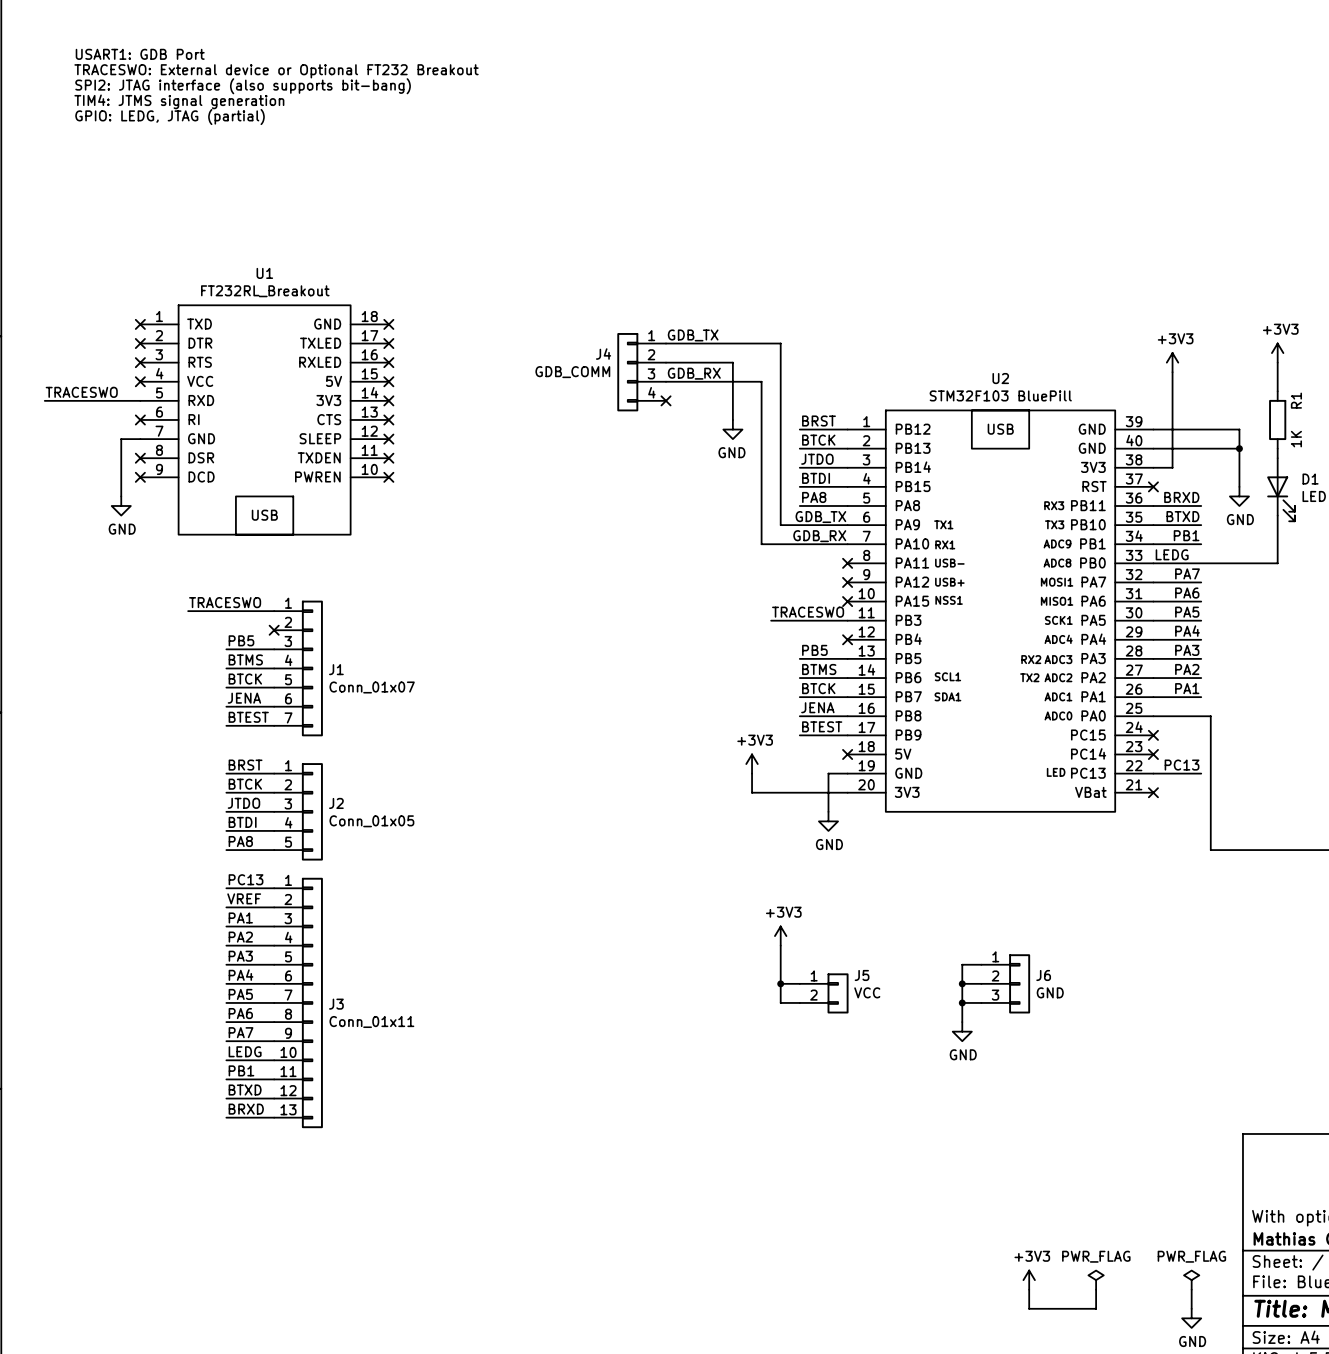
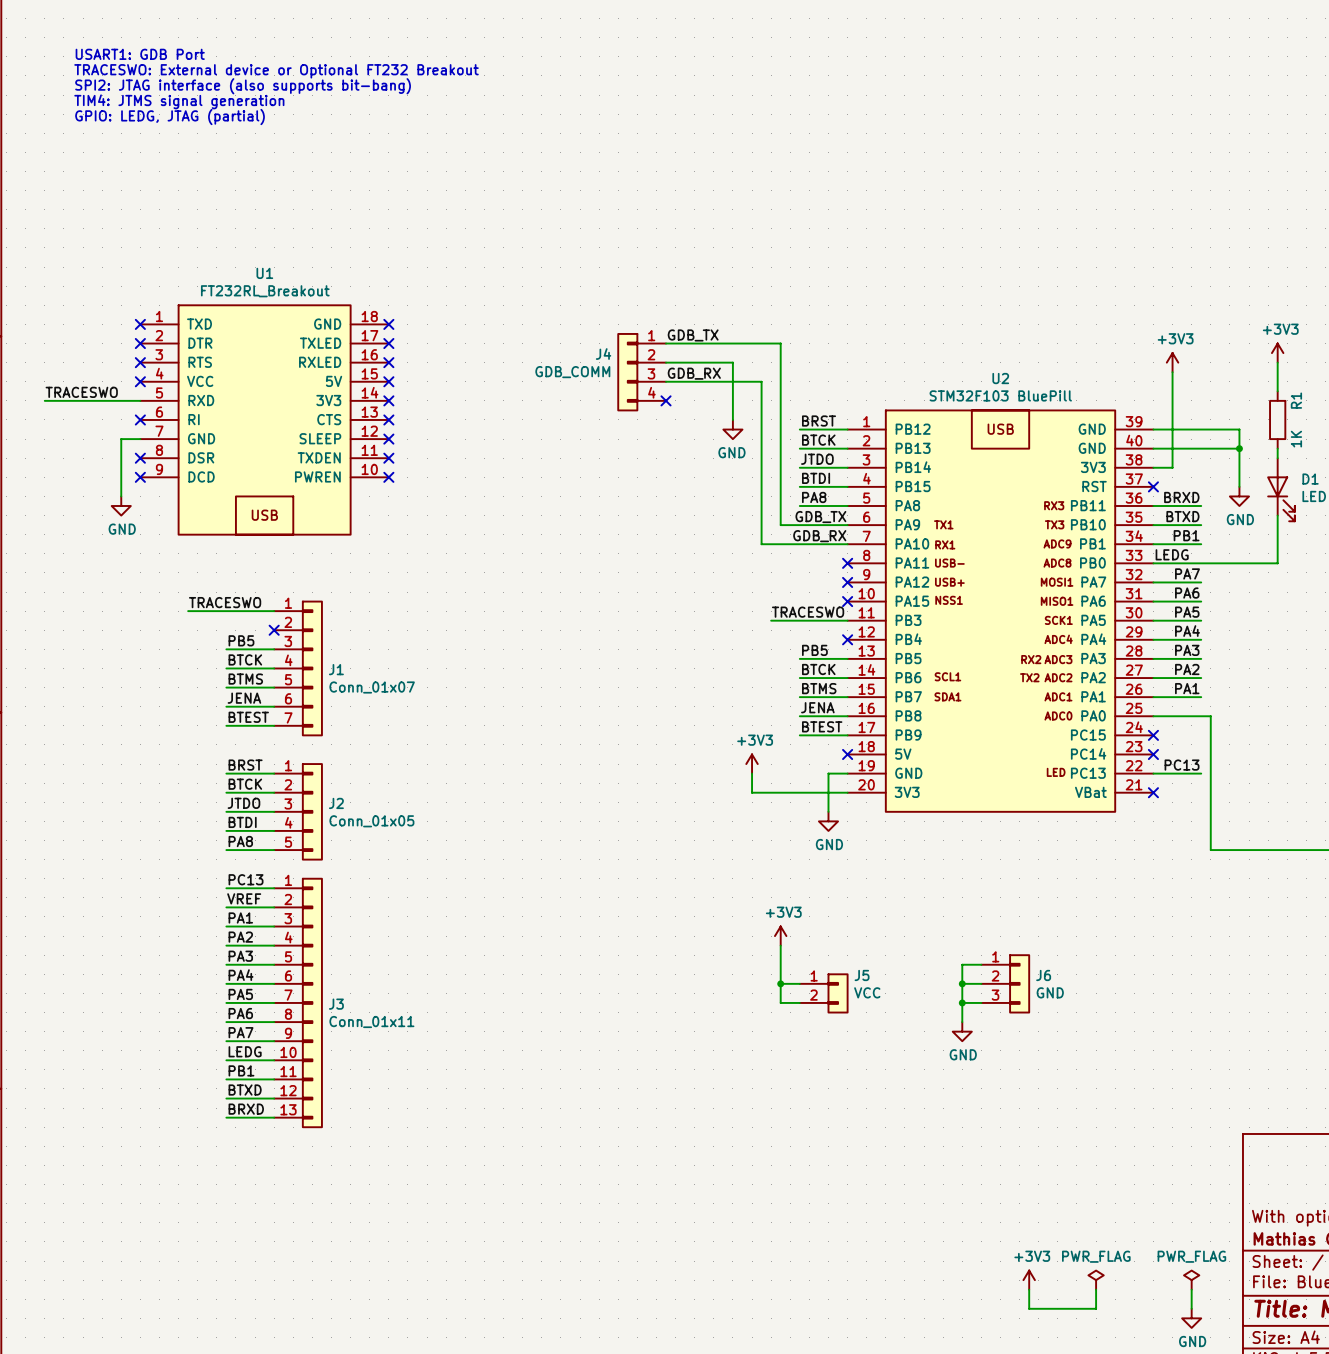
label: BTMS (245, 659) -> BTCK (245, 659)
label: BTMS (819, 669) -> BTCK (818, 669)
label: BTCK (245, 679) -> BTMS (245, 679)
label: BTCK (818, 688) -> BTMS (819, 688)

